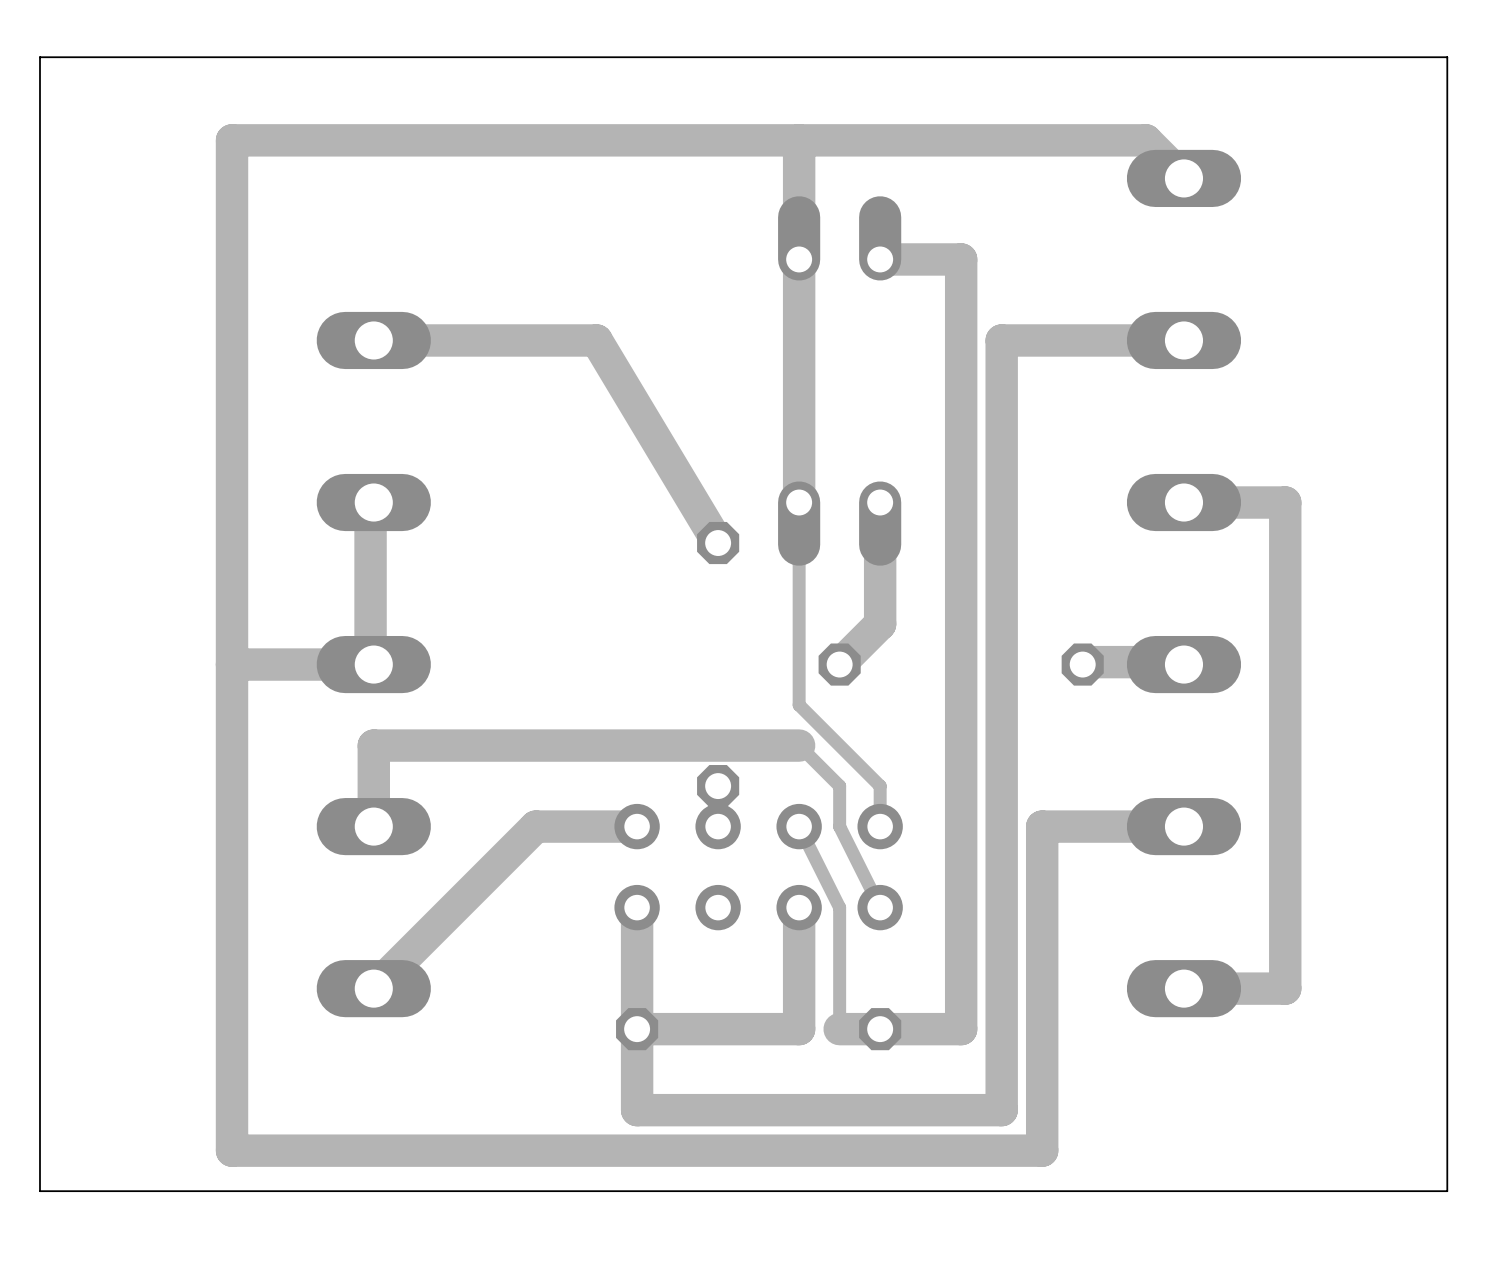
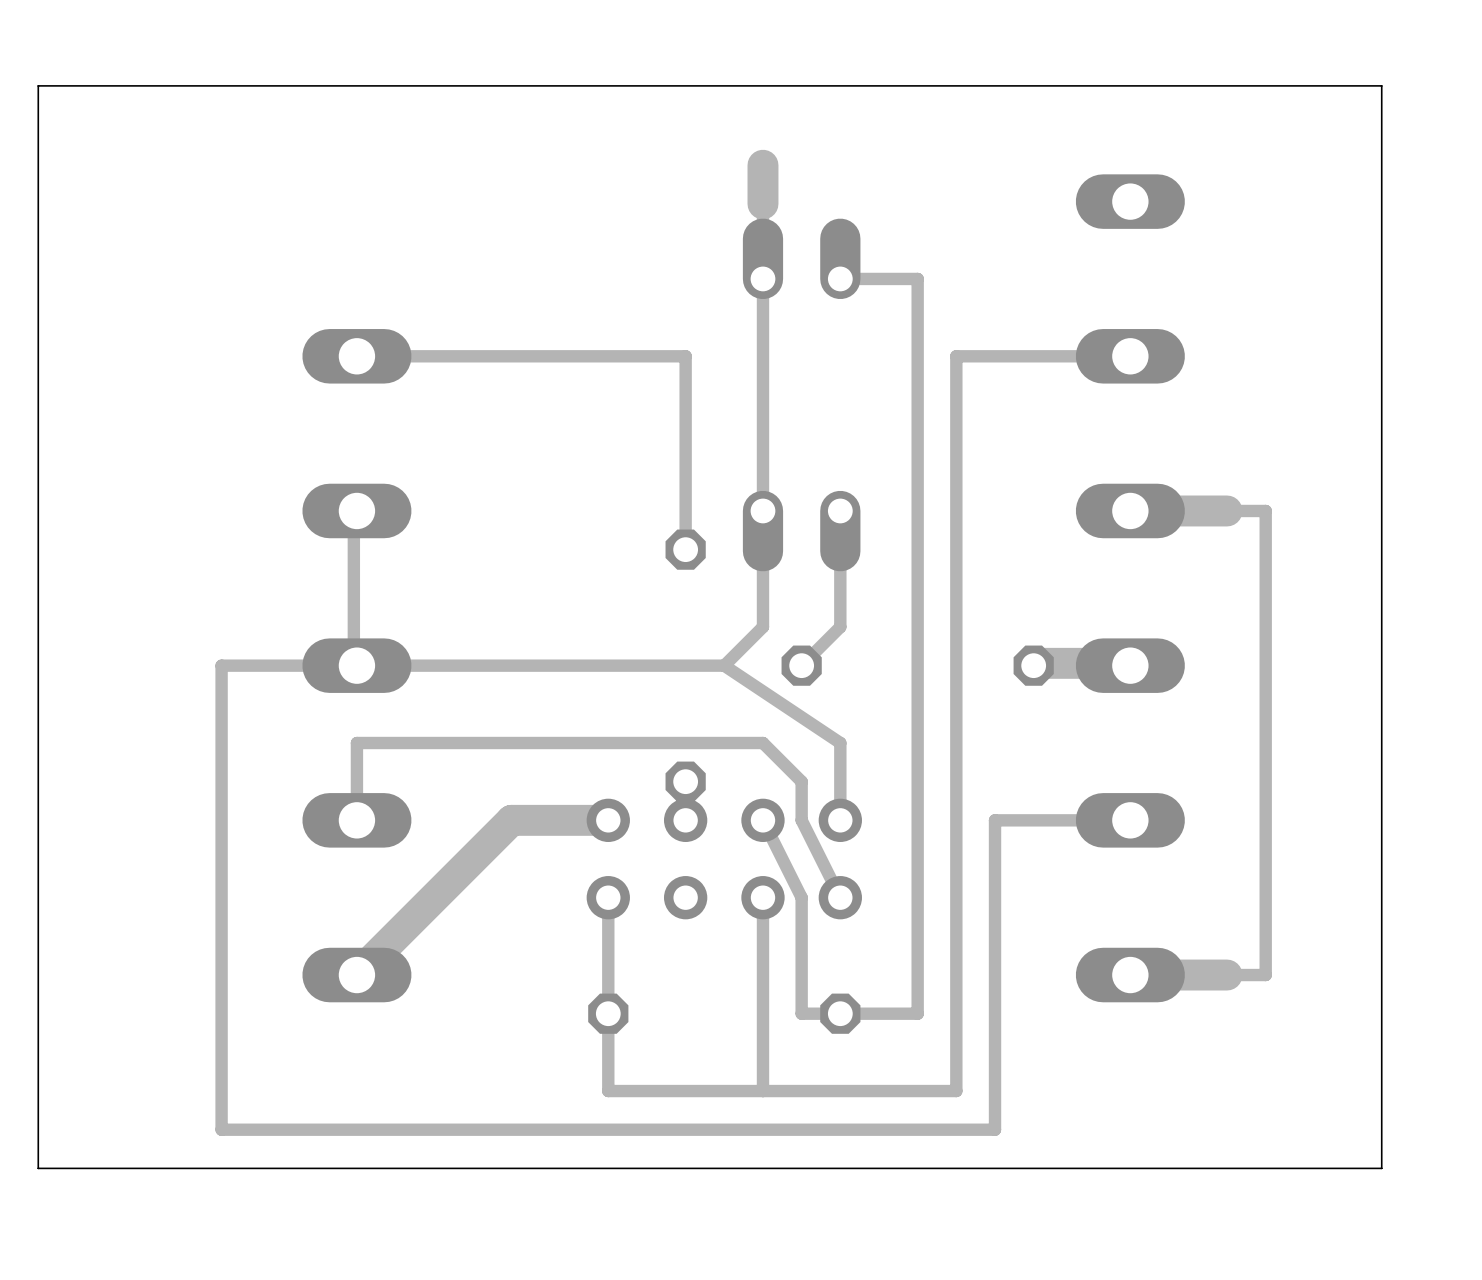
track: (1183, 178) (1145, 140) (232, 140) (232, 664) -> none
track width: thick (799, 180) (799, 502) -> thin (762, 203) (762, 510)
track width: thick (880, 259) (961, 259) (961, 1029) (839, 1029) -> thin (840, 278) (917, 278) (917, 1013) (801, 1013)
track: (596, 340) (718, 543) -> (569, 356) (685, 356) (685, 549)
track width: thick (596, 340) (373, 340) -> thin (569, 356) (356, 356)
track width: thick (1183, 340) (1001, 340) (1001, 1110) (637, 1110) (637, 907) -> thin (1130, 356) (956, 356) (956, 1091) (608, 1091) (608, 897)
track width: thick (880, 502) (880, 624) (839, 664) -> thin (840, 510) (840, 626) (801, 665)
track: (1285, 502) (1285, 988) -> (1227, 510) (1265, 510) (1265, 975) (1227, 975)
track width: thick (370, 505) (370, 662) -> thin (353, 514) (353, 663)
track: (799, 624) (799, 705) (880, 786) -> (724, 665) (840, 743) (840, 781)
track: none -> (762, 626) (724, 665)
track: none -> (353, 663) (356, 665) (724, 665)
track width: thick (373, 664) (232, 664) (232, 1150) (1042, 1150) (1042, 826) (1183, 826) -> thin (356, 665) (221, 665) (221, 1129) (995, 1129) (995, 820) (1130, 820)
track width: thick (799, 745) (373, 745) (373, 826) -> thin (762, 743) (356, 743) (356, 820)
track width: thick (799, 907) (799, 1029) -> thin (762, 897) (762, 1013)
track: (799, 1029) (637, 1029) -> (762, 1013) (762, 1091)

